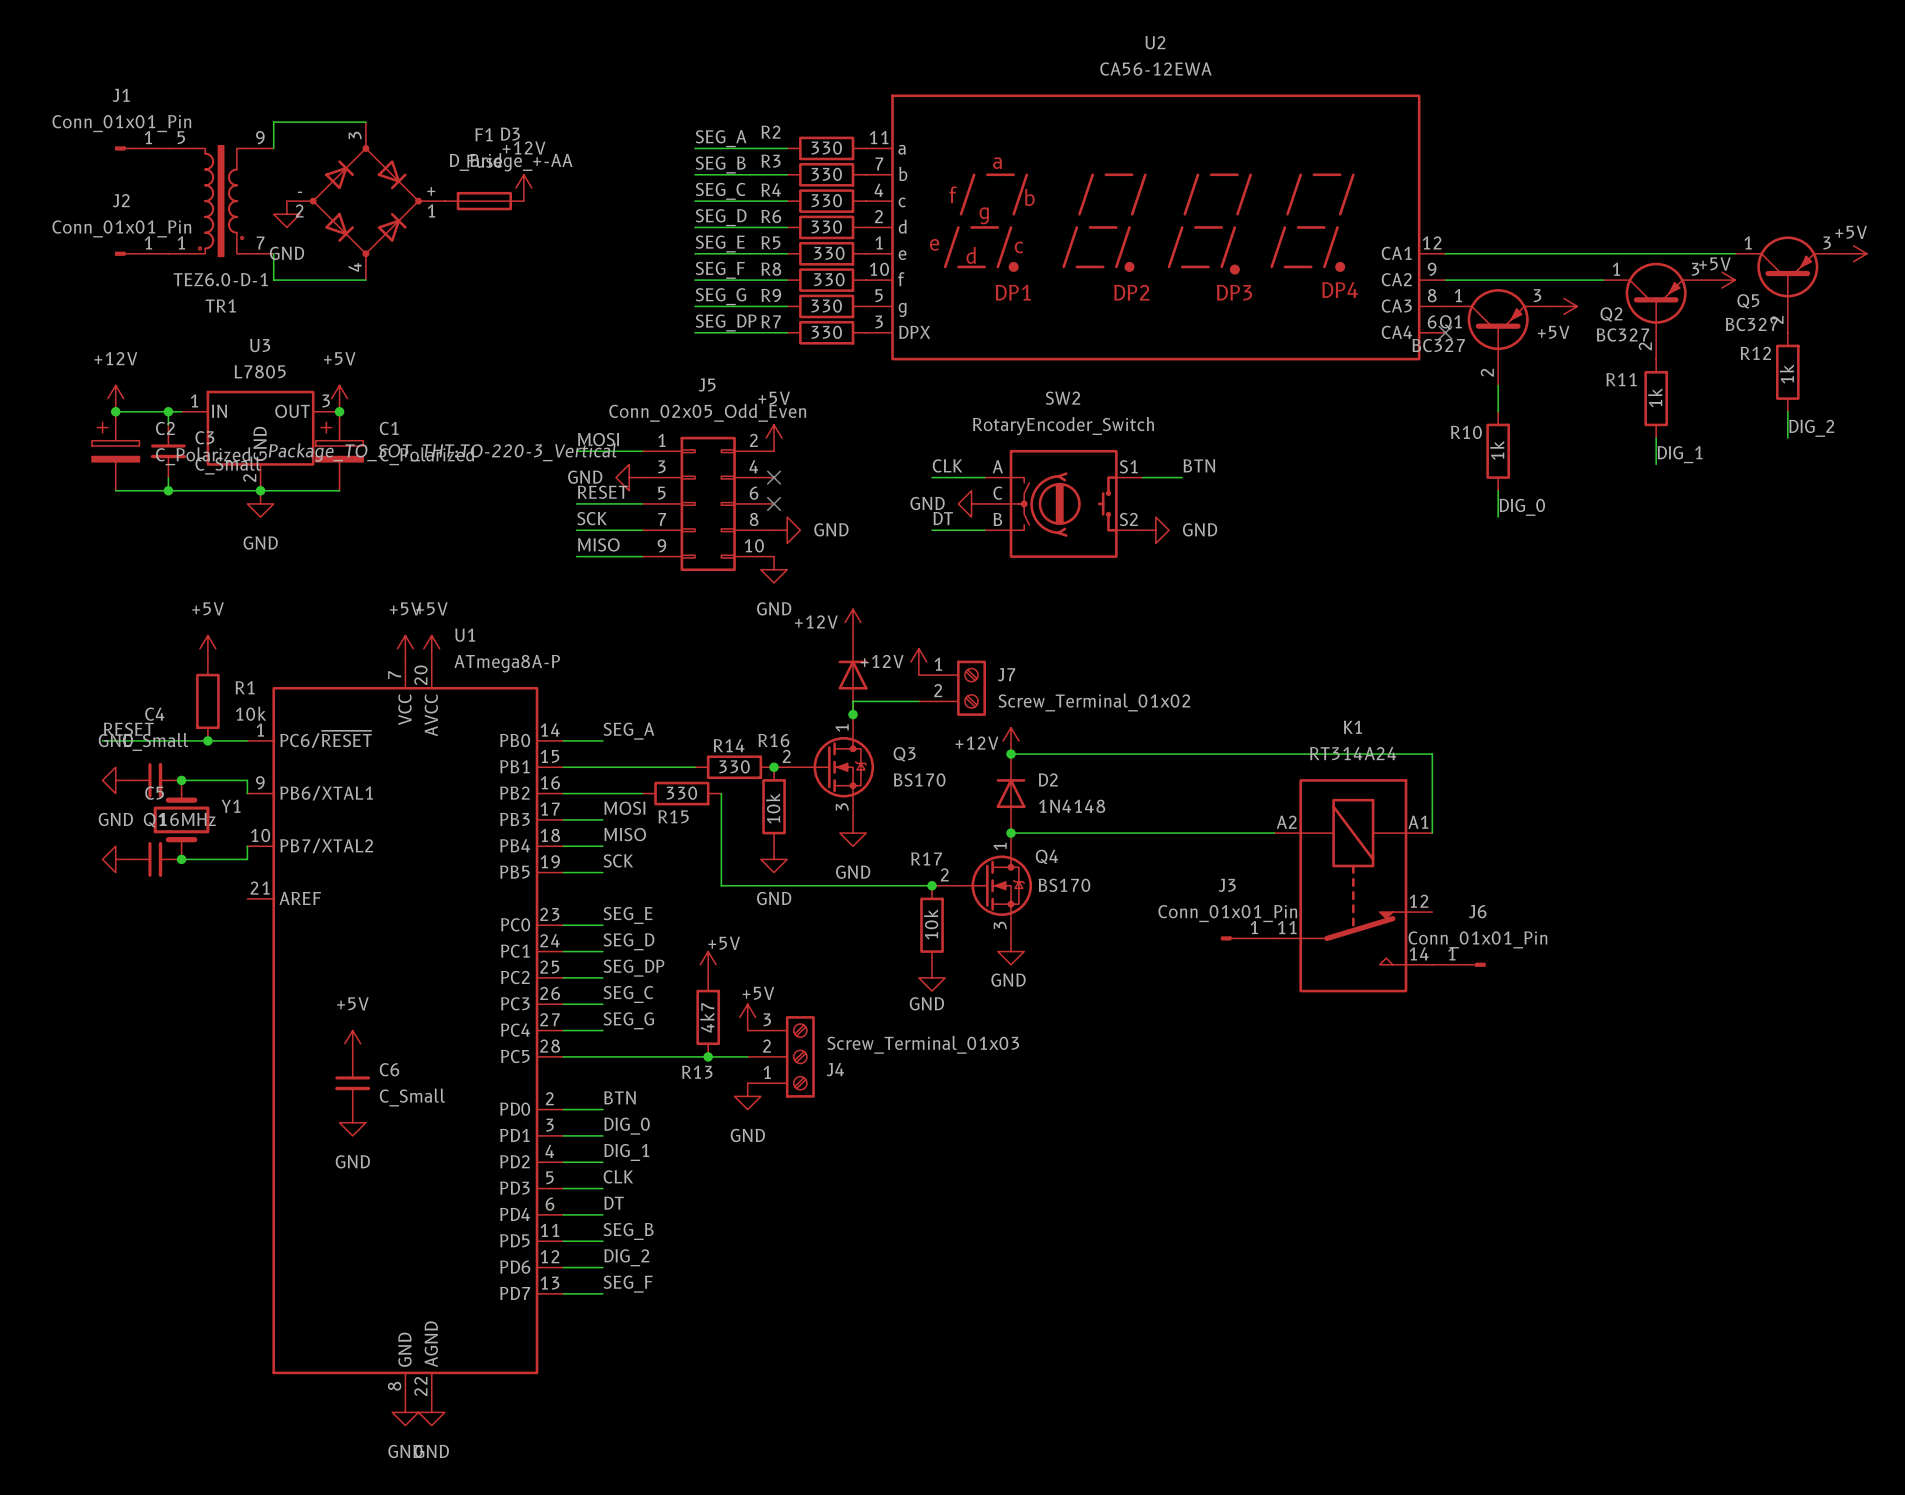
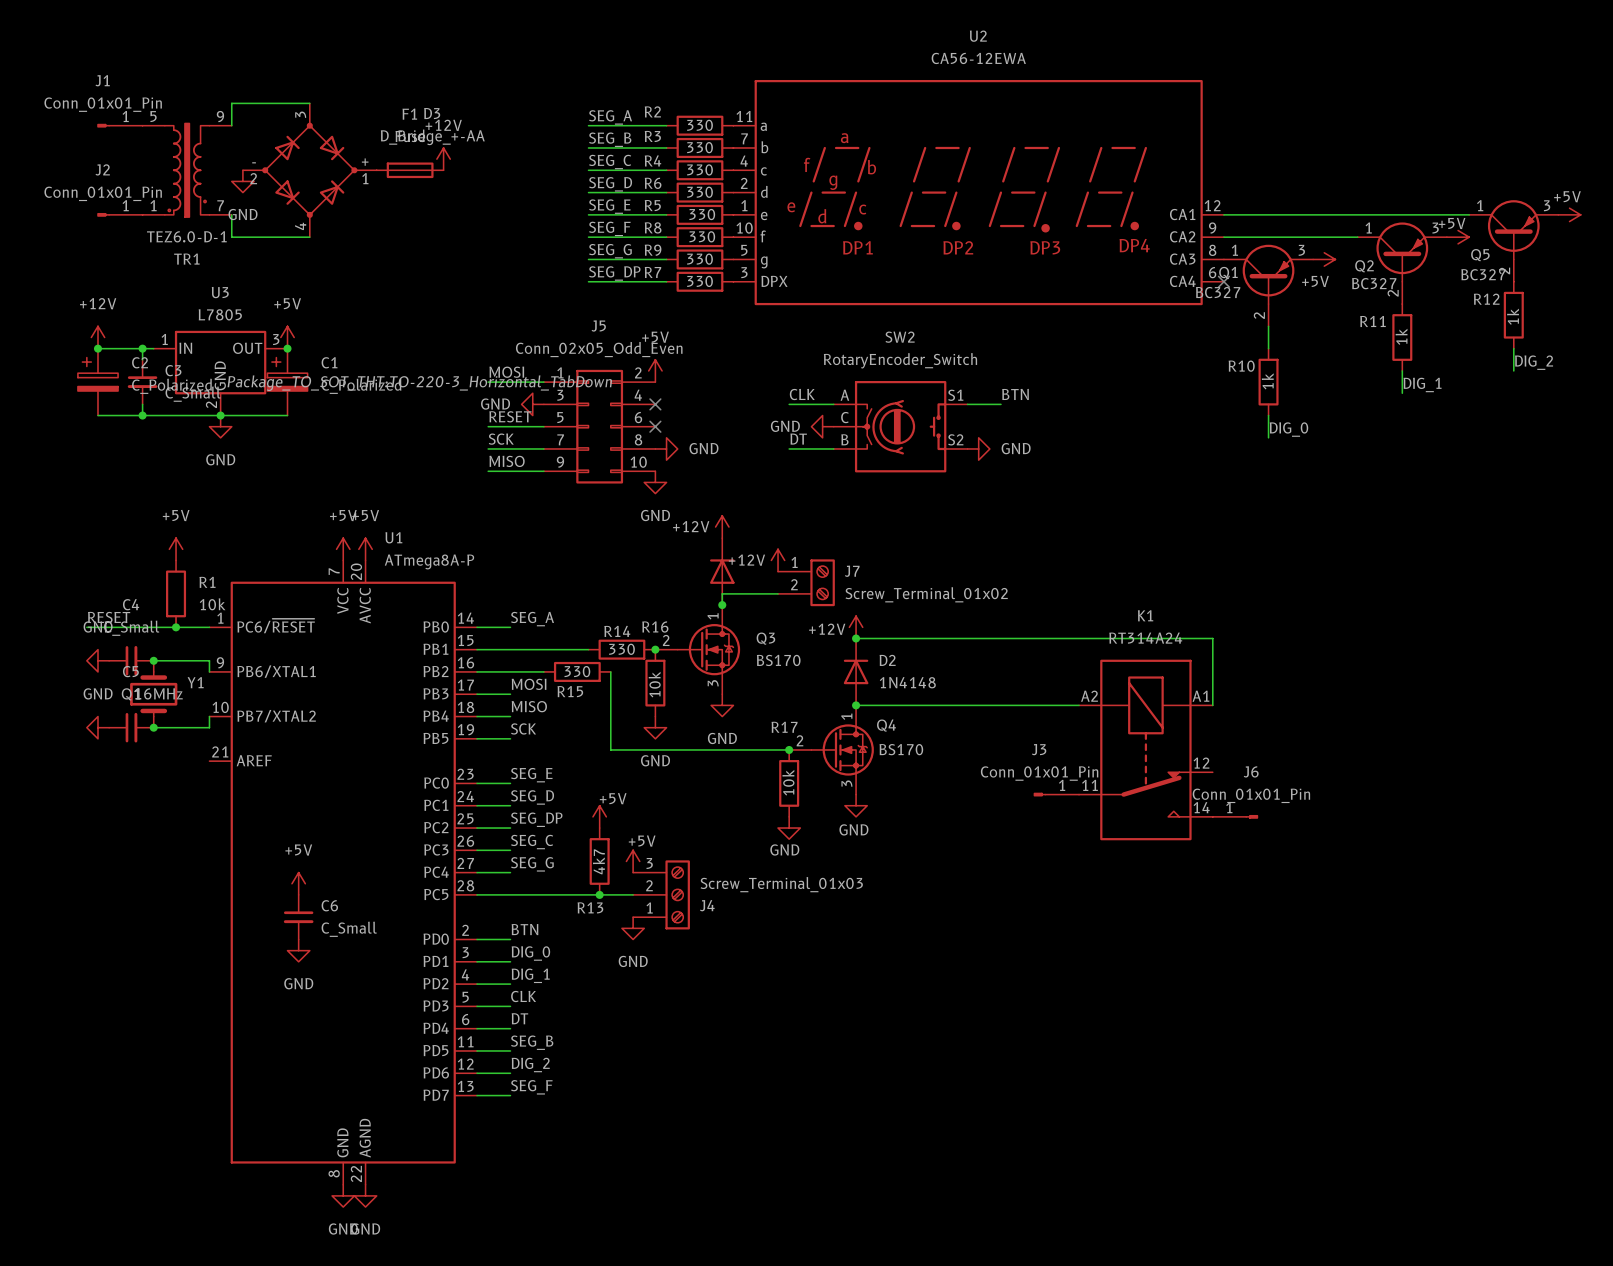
U3 text: Package_TO_SOT_THT:TO-220-3_Vertical (442, 452) -> Package_TO_SOT_THT:TO-220-3_Horizontal_TabDown (419, 383)

